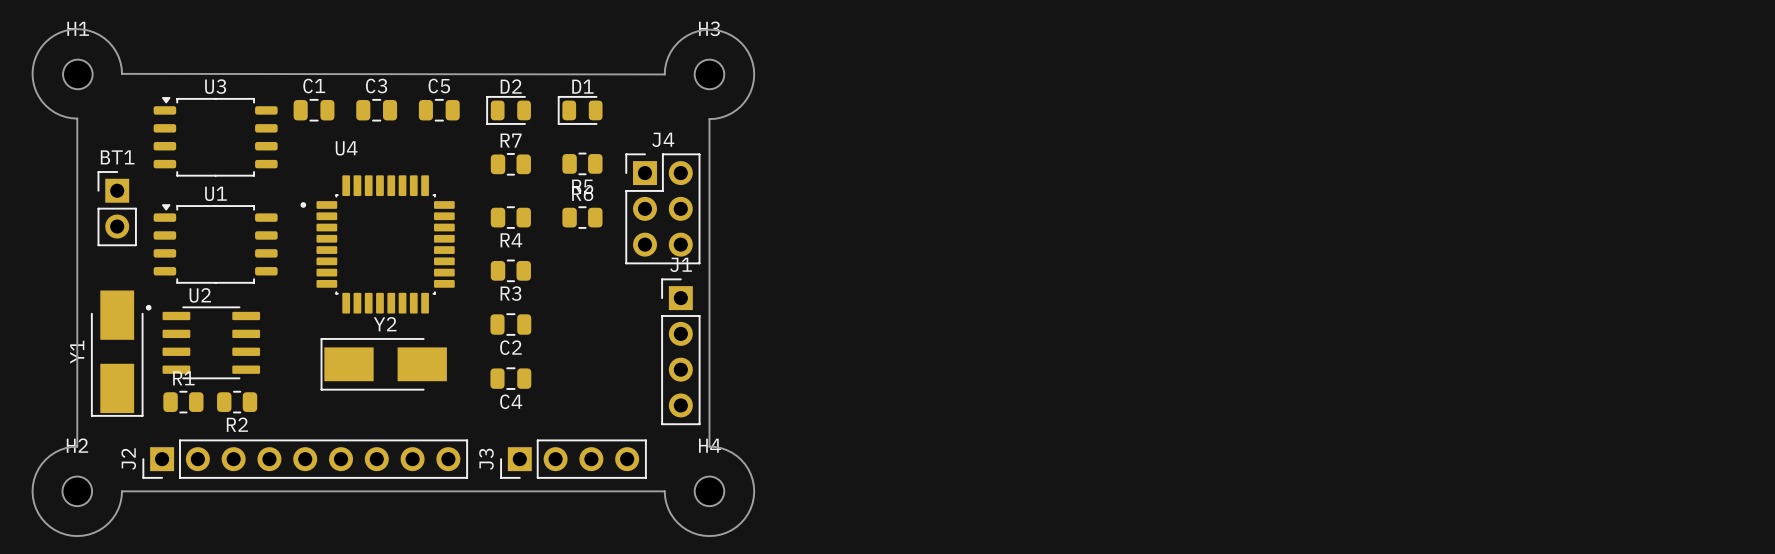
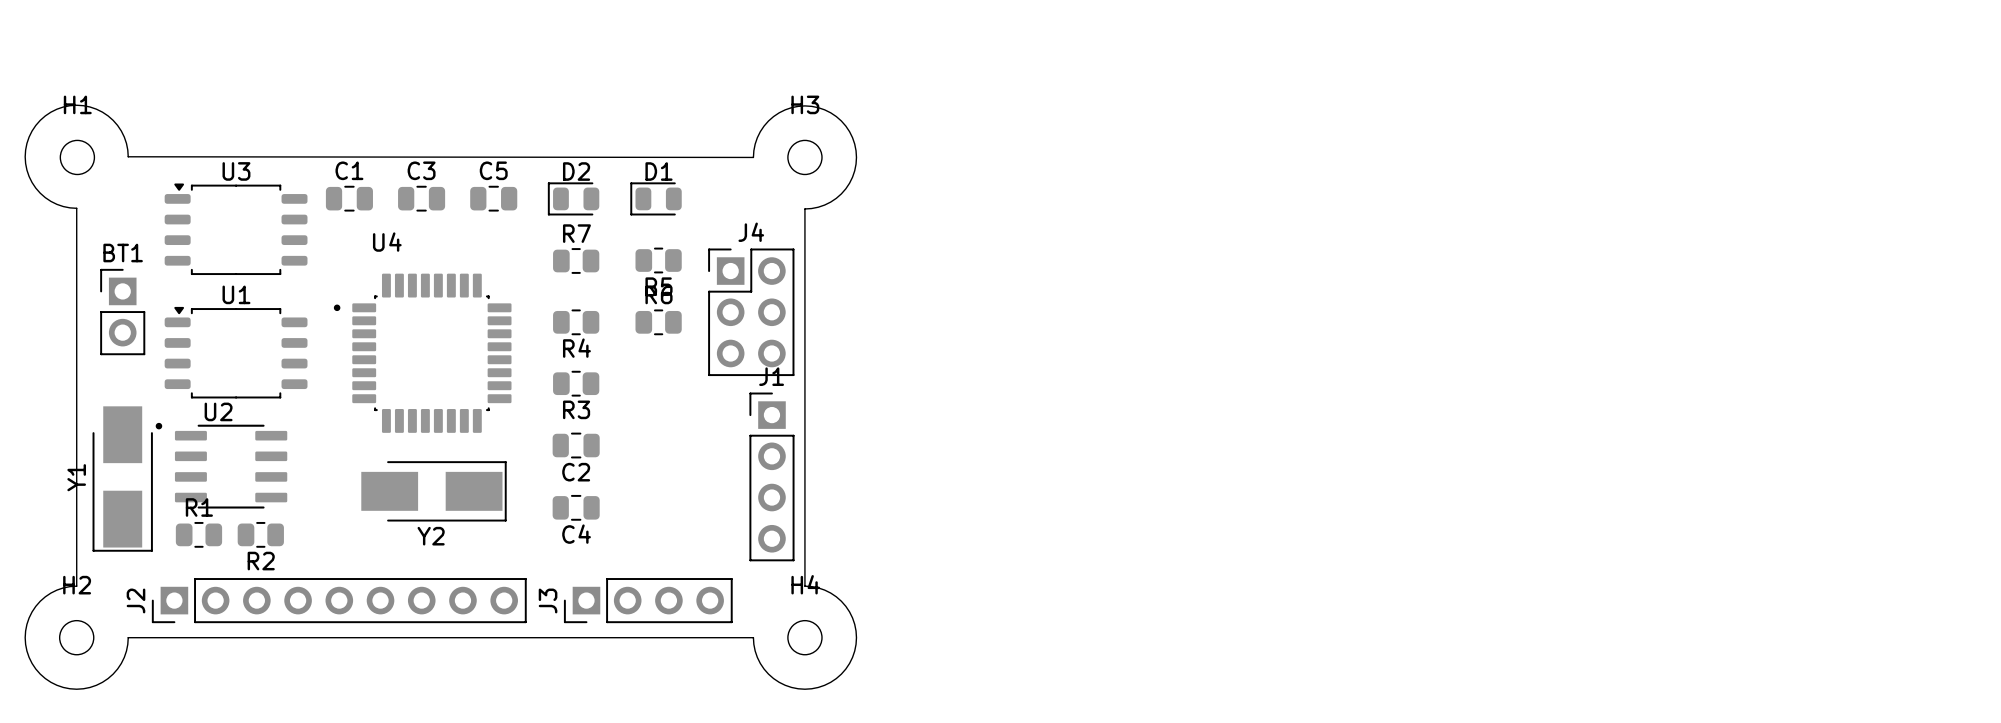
Y2 rotation: 0° (383, 364) -> 180° (434, 491)

